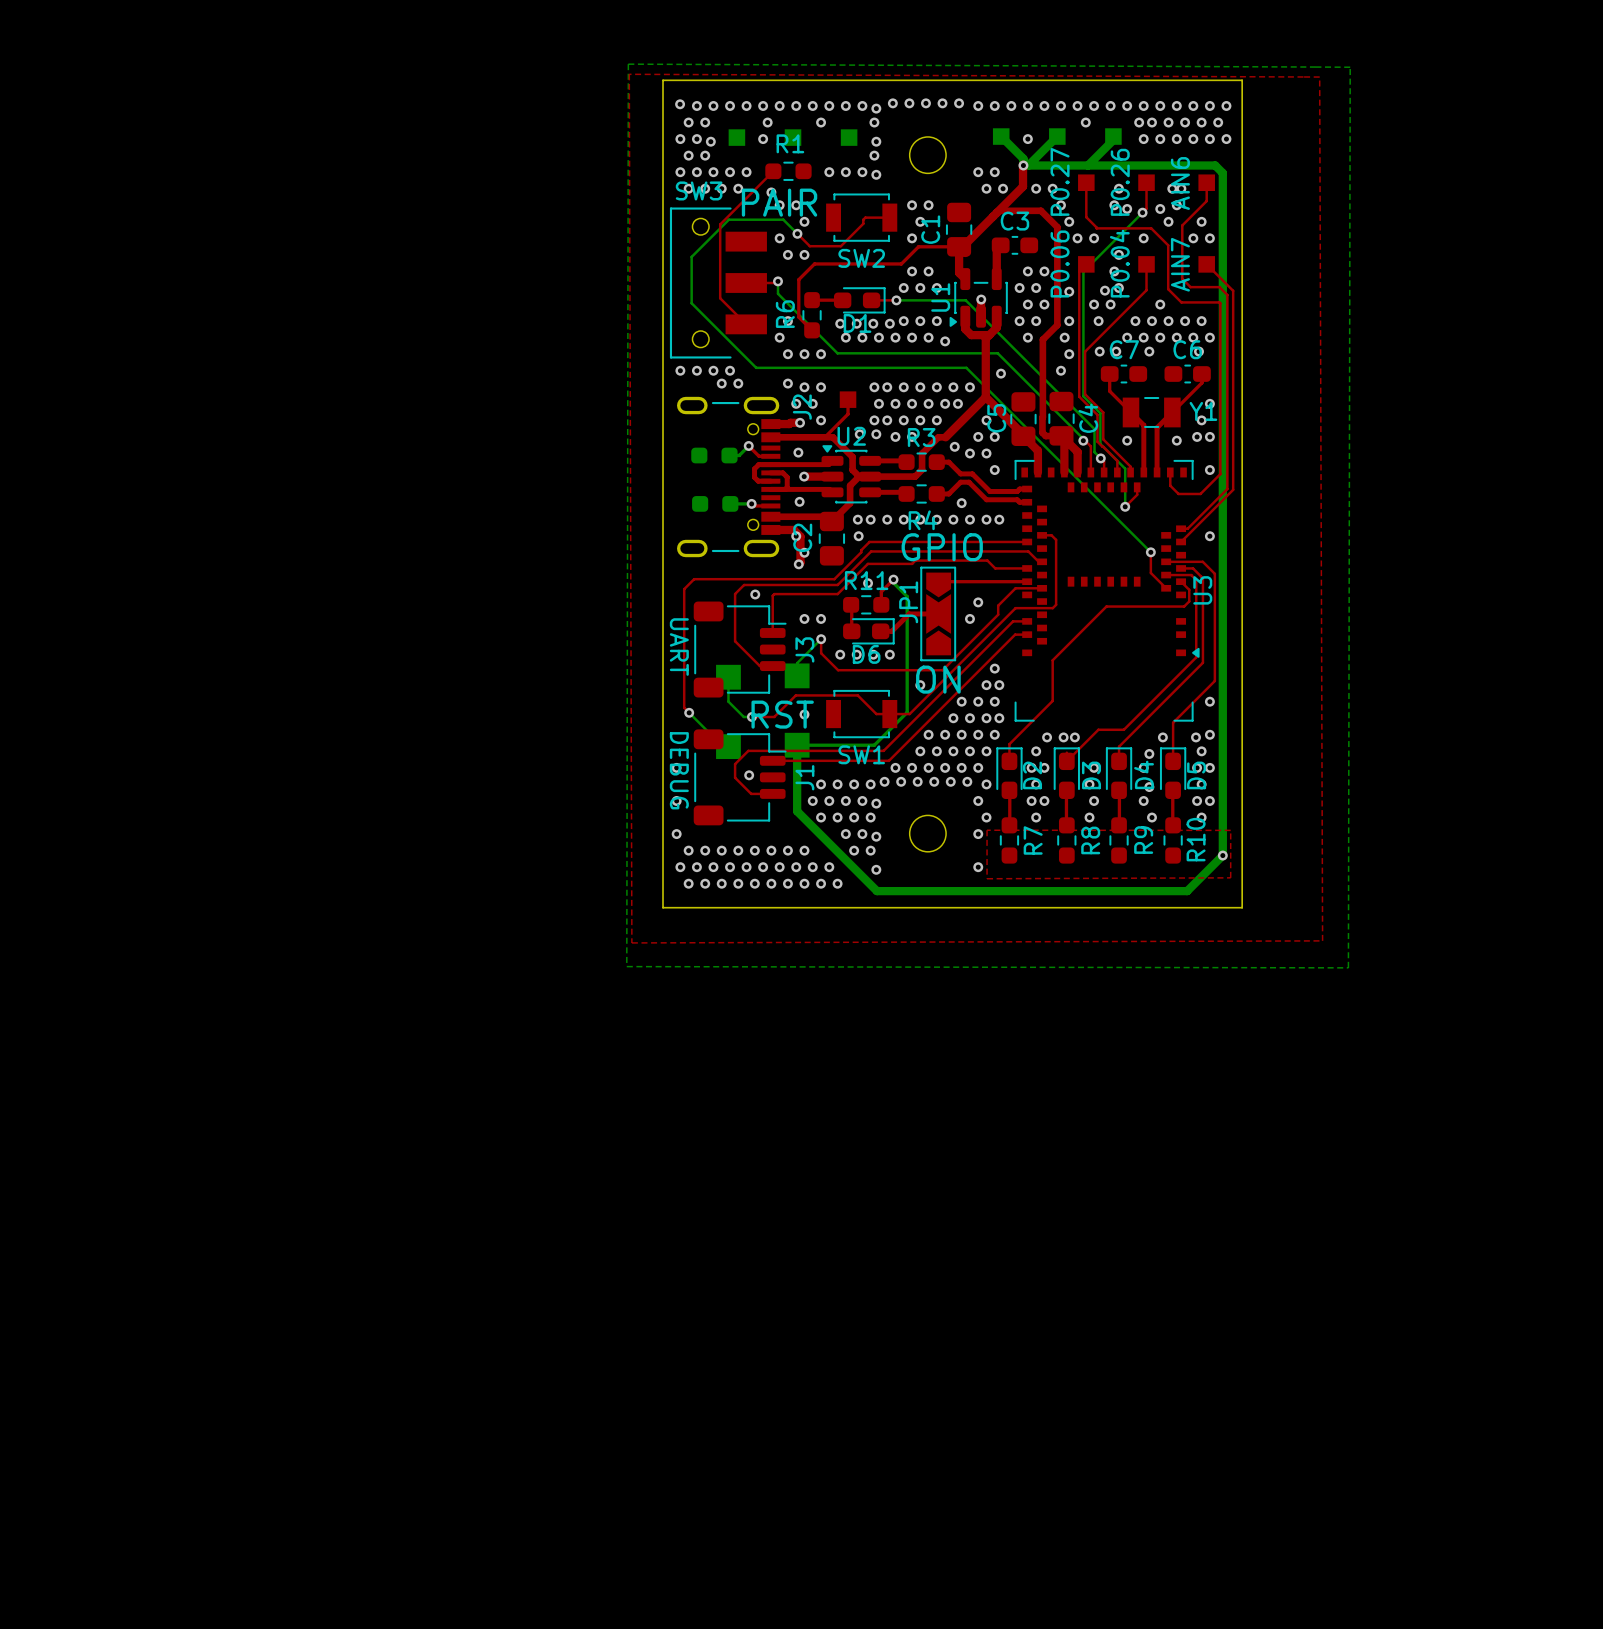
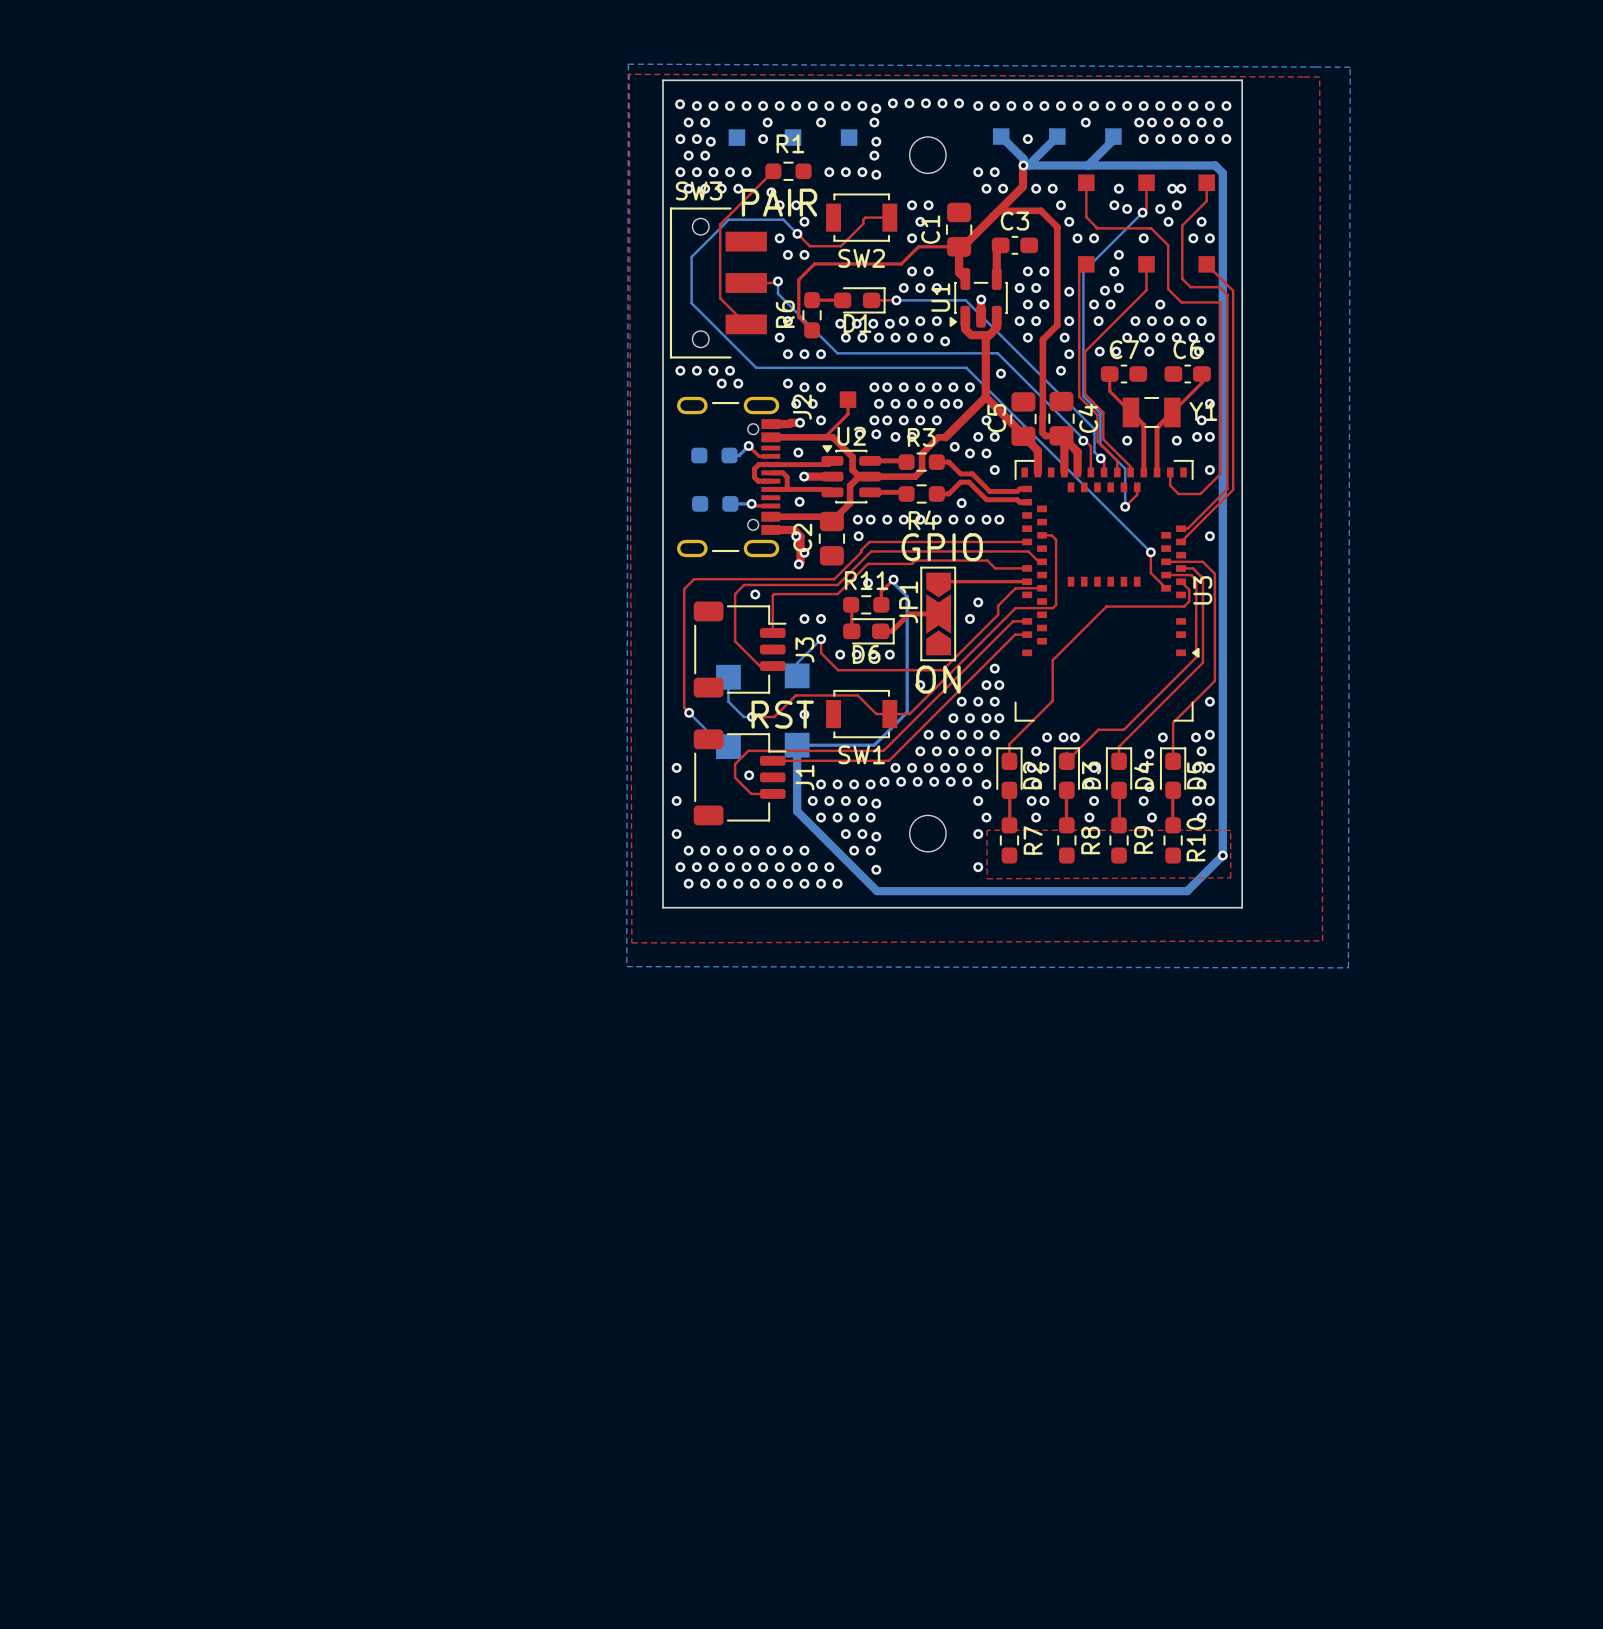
part value: P0.27 (1060, 181) -> none
part value: P0.26 (1120, 182) -> none
part value: AIN6 (1180, 183) -> none
part value: P0.06 (1060, 263) -> none
part value: P0.04 (1119, 263) -> none
part value: AIN7 (1180, 264) -> none
text: UART (679, 647) -> none
text: DEBUG (679, 770) -> none

